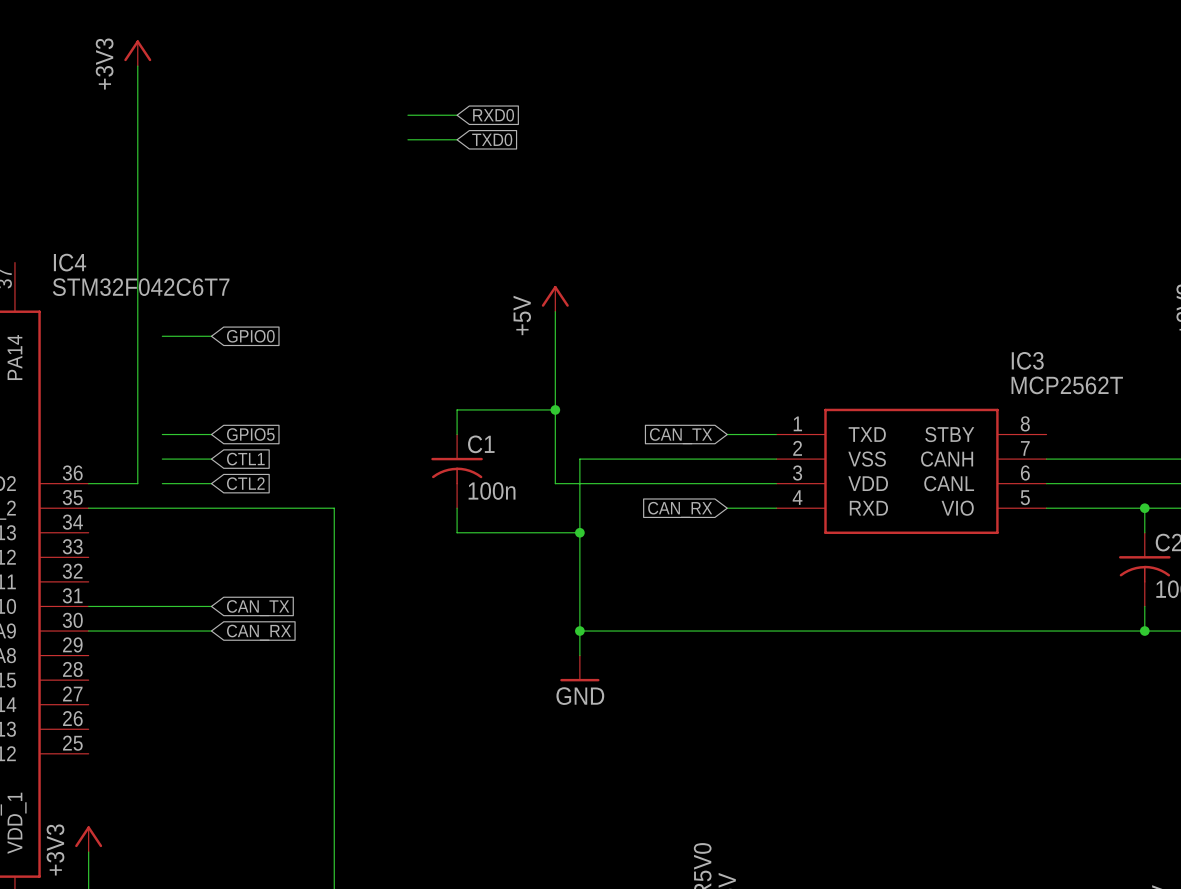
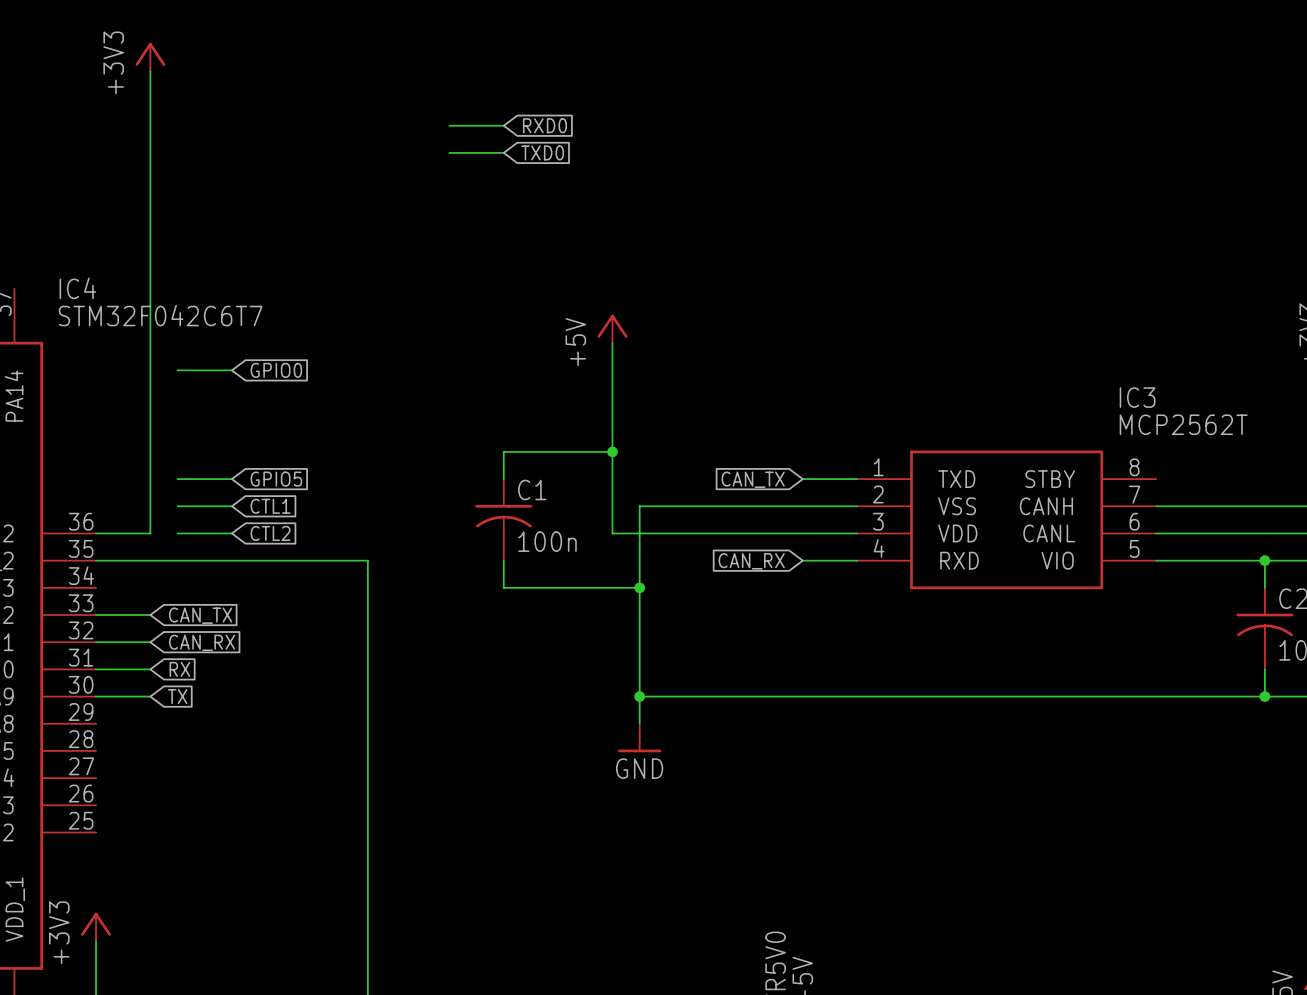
wire: none -> (96, 615) (150, 615)
wire: none -> (96, 642) (150, 642)
wire: (137, 606) (211, 606) -> none
global label: none -> RX (179, 669)
global label position: CAN_TX (258, 608) -> CAN_TX (200, 615)
wire: (137, 631) (211, 631) -> none
global label: none -> TX (177, 696)
global label position: CAN_RX (259, 632) -> CAN_RX (202, 642)

